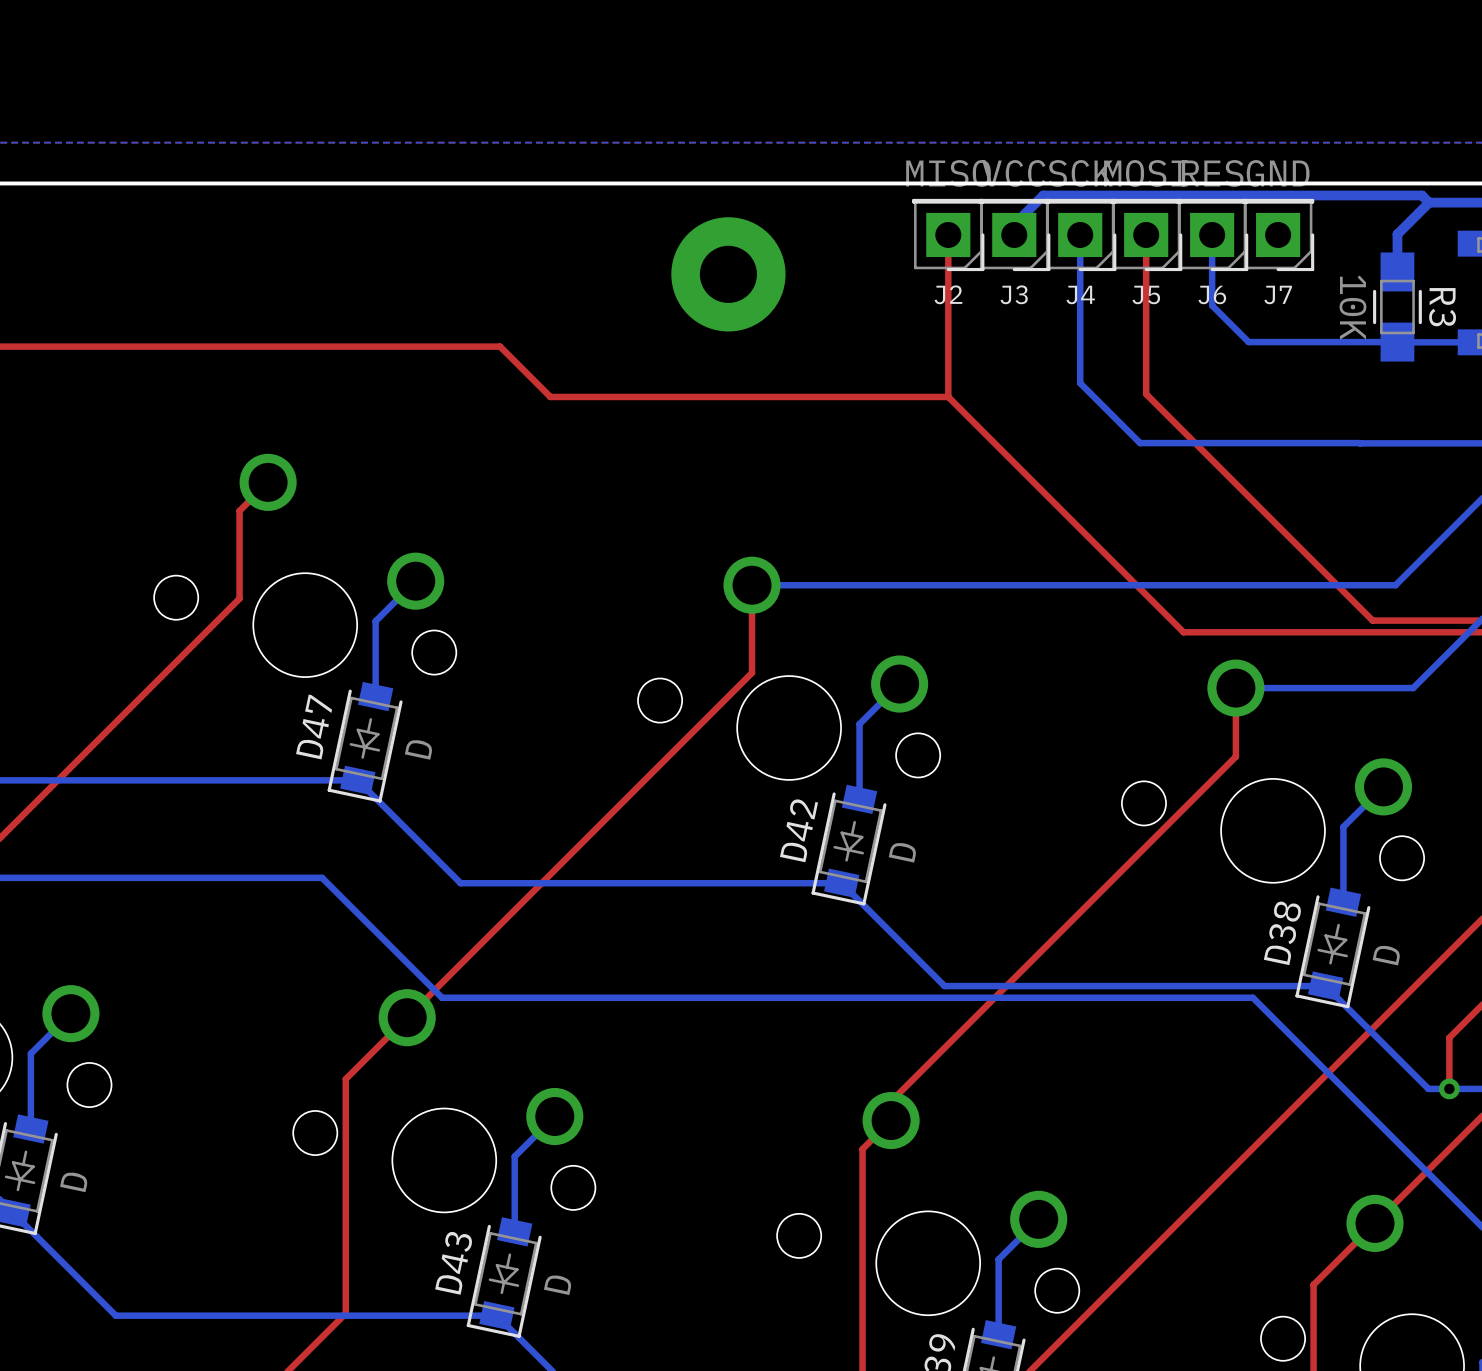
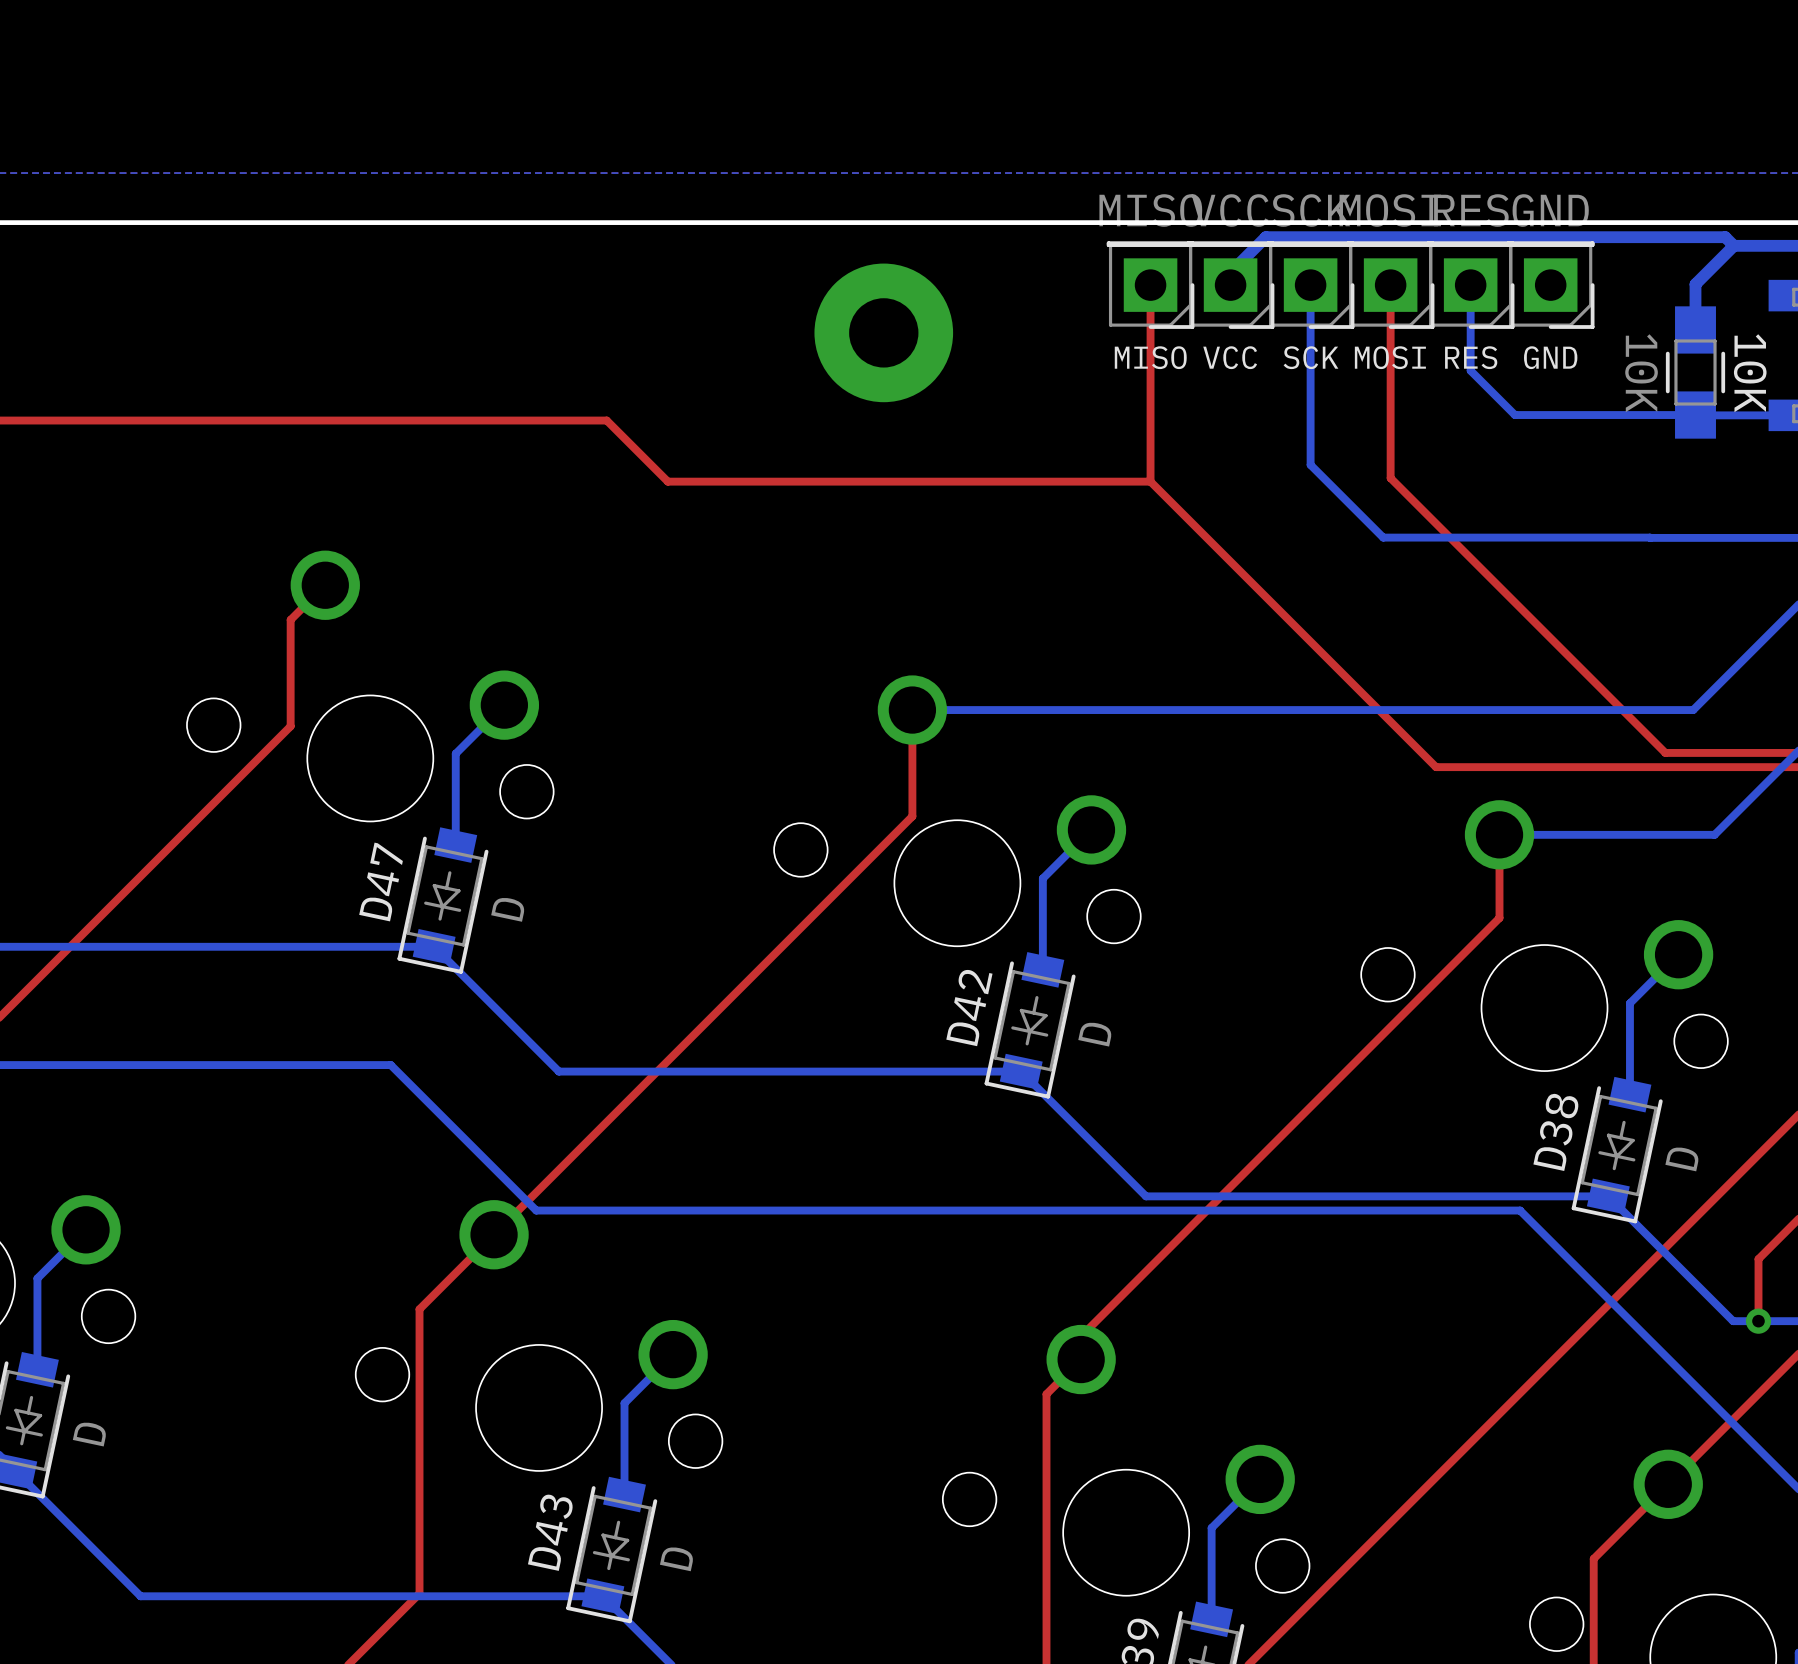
J2 name: J2 (948, 294) -> MISO (1150, 357)
J3 name: J3 (1014, 294) -> VCC (1230, 357)
J4 name: J4 (1080, 294) -> SCK (1310, 357)
J5 name: J5 (1146, 294) -> MOSI (1390, 357)
J6 name: J6 (1212, 294) -> RES (1471, 357)
J7 name: J7 (1278, 294) -> GND (1550, 357)
R3 name: R3 (1442, 307) -> 10K (1750, 373)

